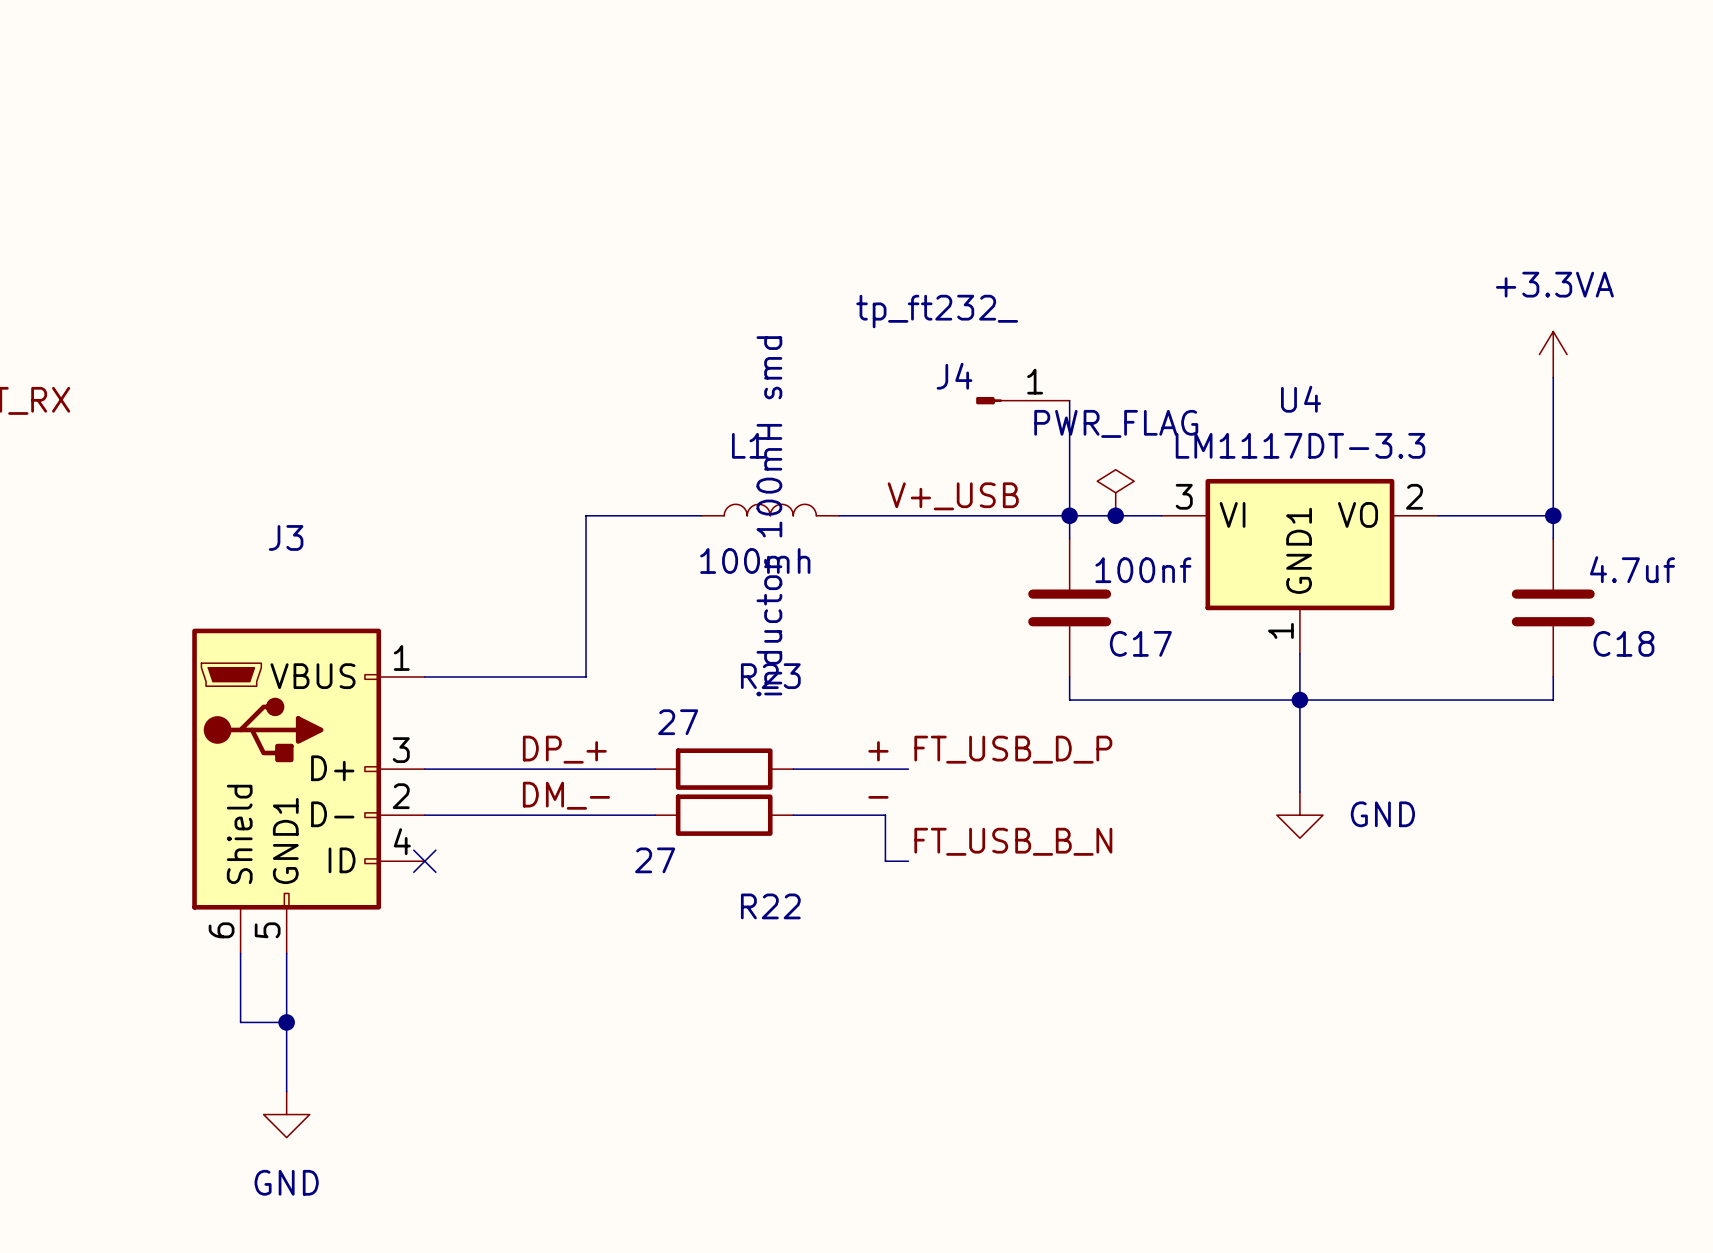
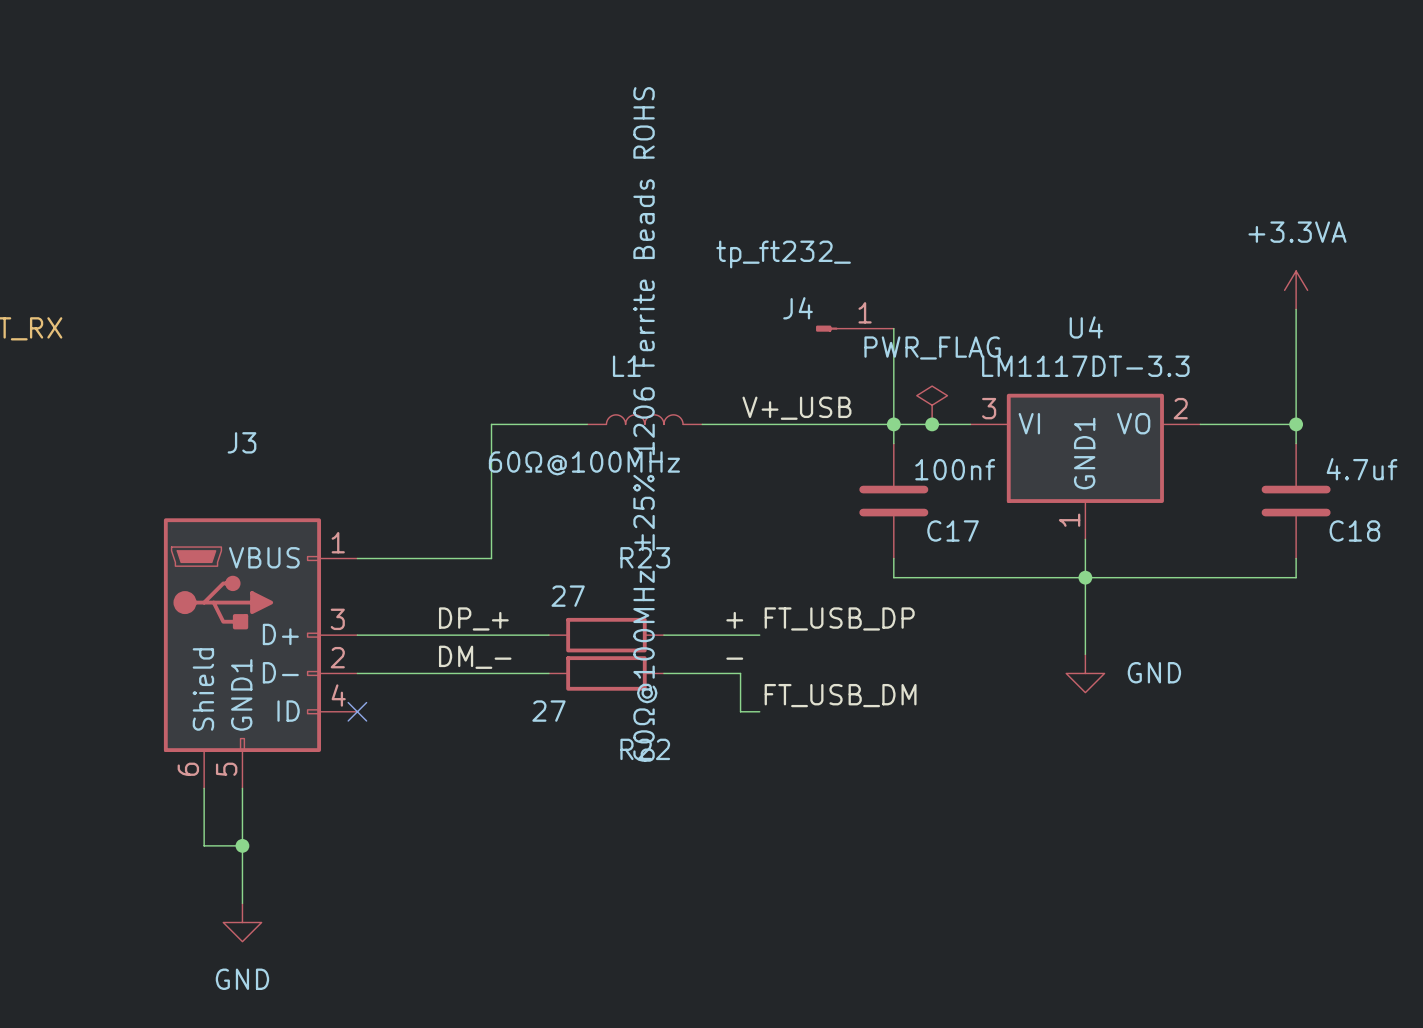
L1 text: inductor 100mH smd (769, 516) -> 60Ω@100MHz ±25% 1206 Ferrite Beads ROHS (645, 424)
L1 value: 100mh (755, 560) -> 60Ω@100MHz (584, 463)
label: FT_USB_D_P (1013, 749) -> FT_USB_DP (839, 618)
label: FT_USB_B_N (1013, 841) -> FT_USB_DM (840, 695)

